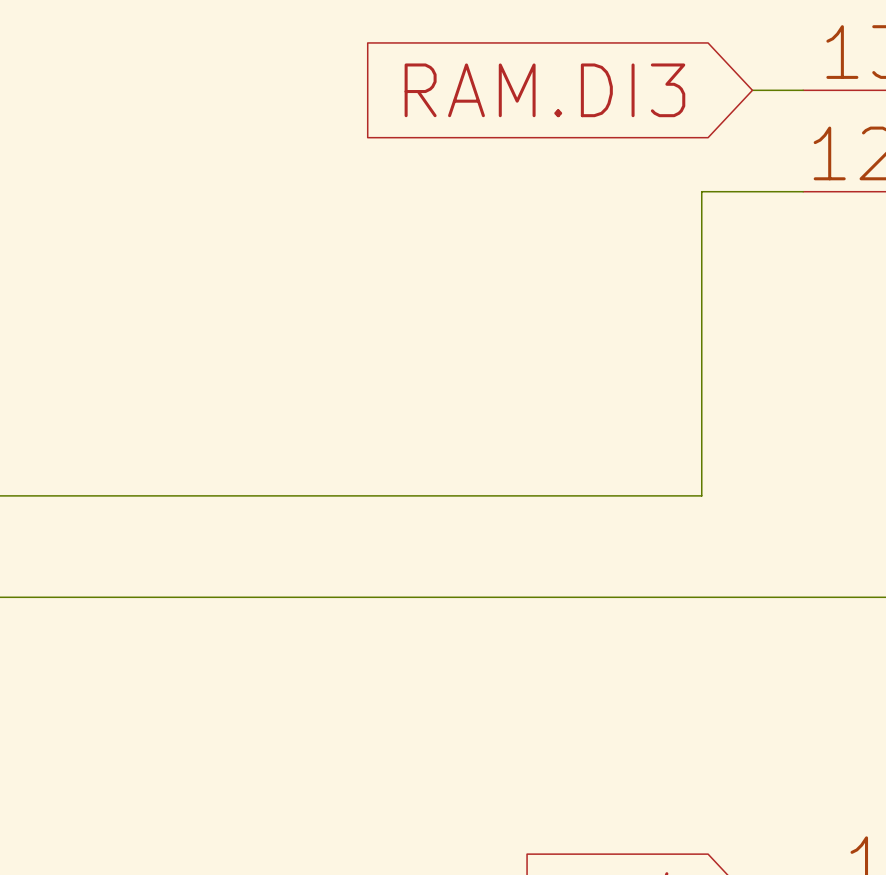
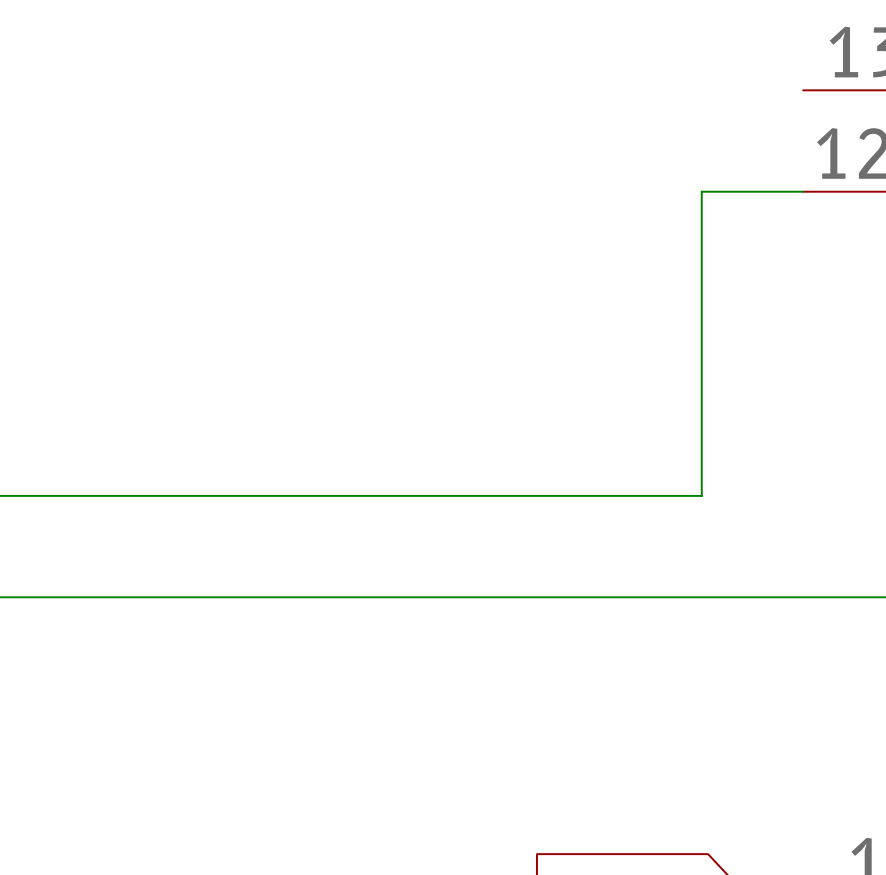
global label: RAM.DI3 (544, 90) -> none
wire: (752, 90) (803, 90) -> none

